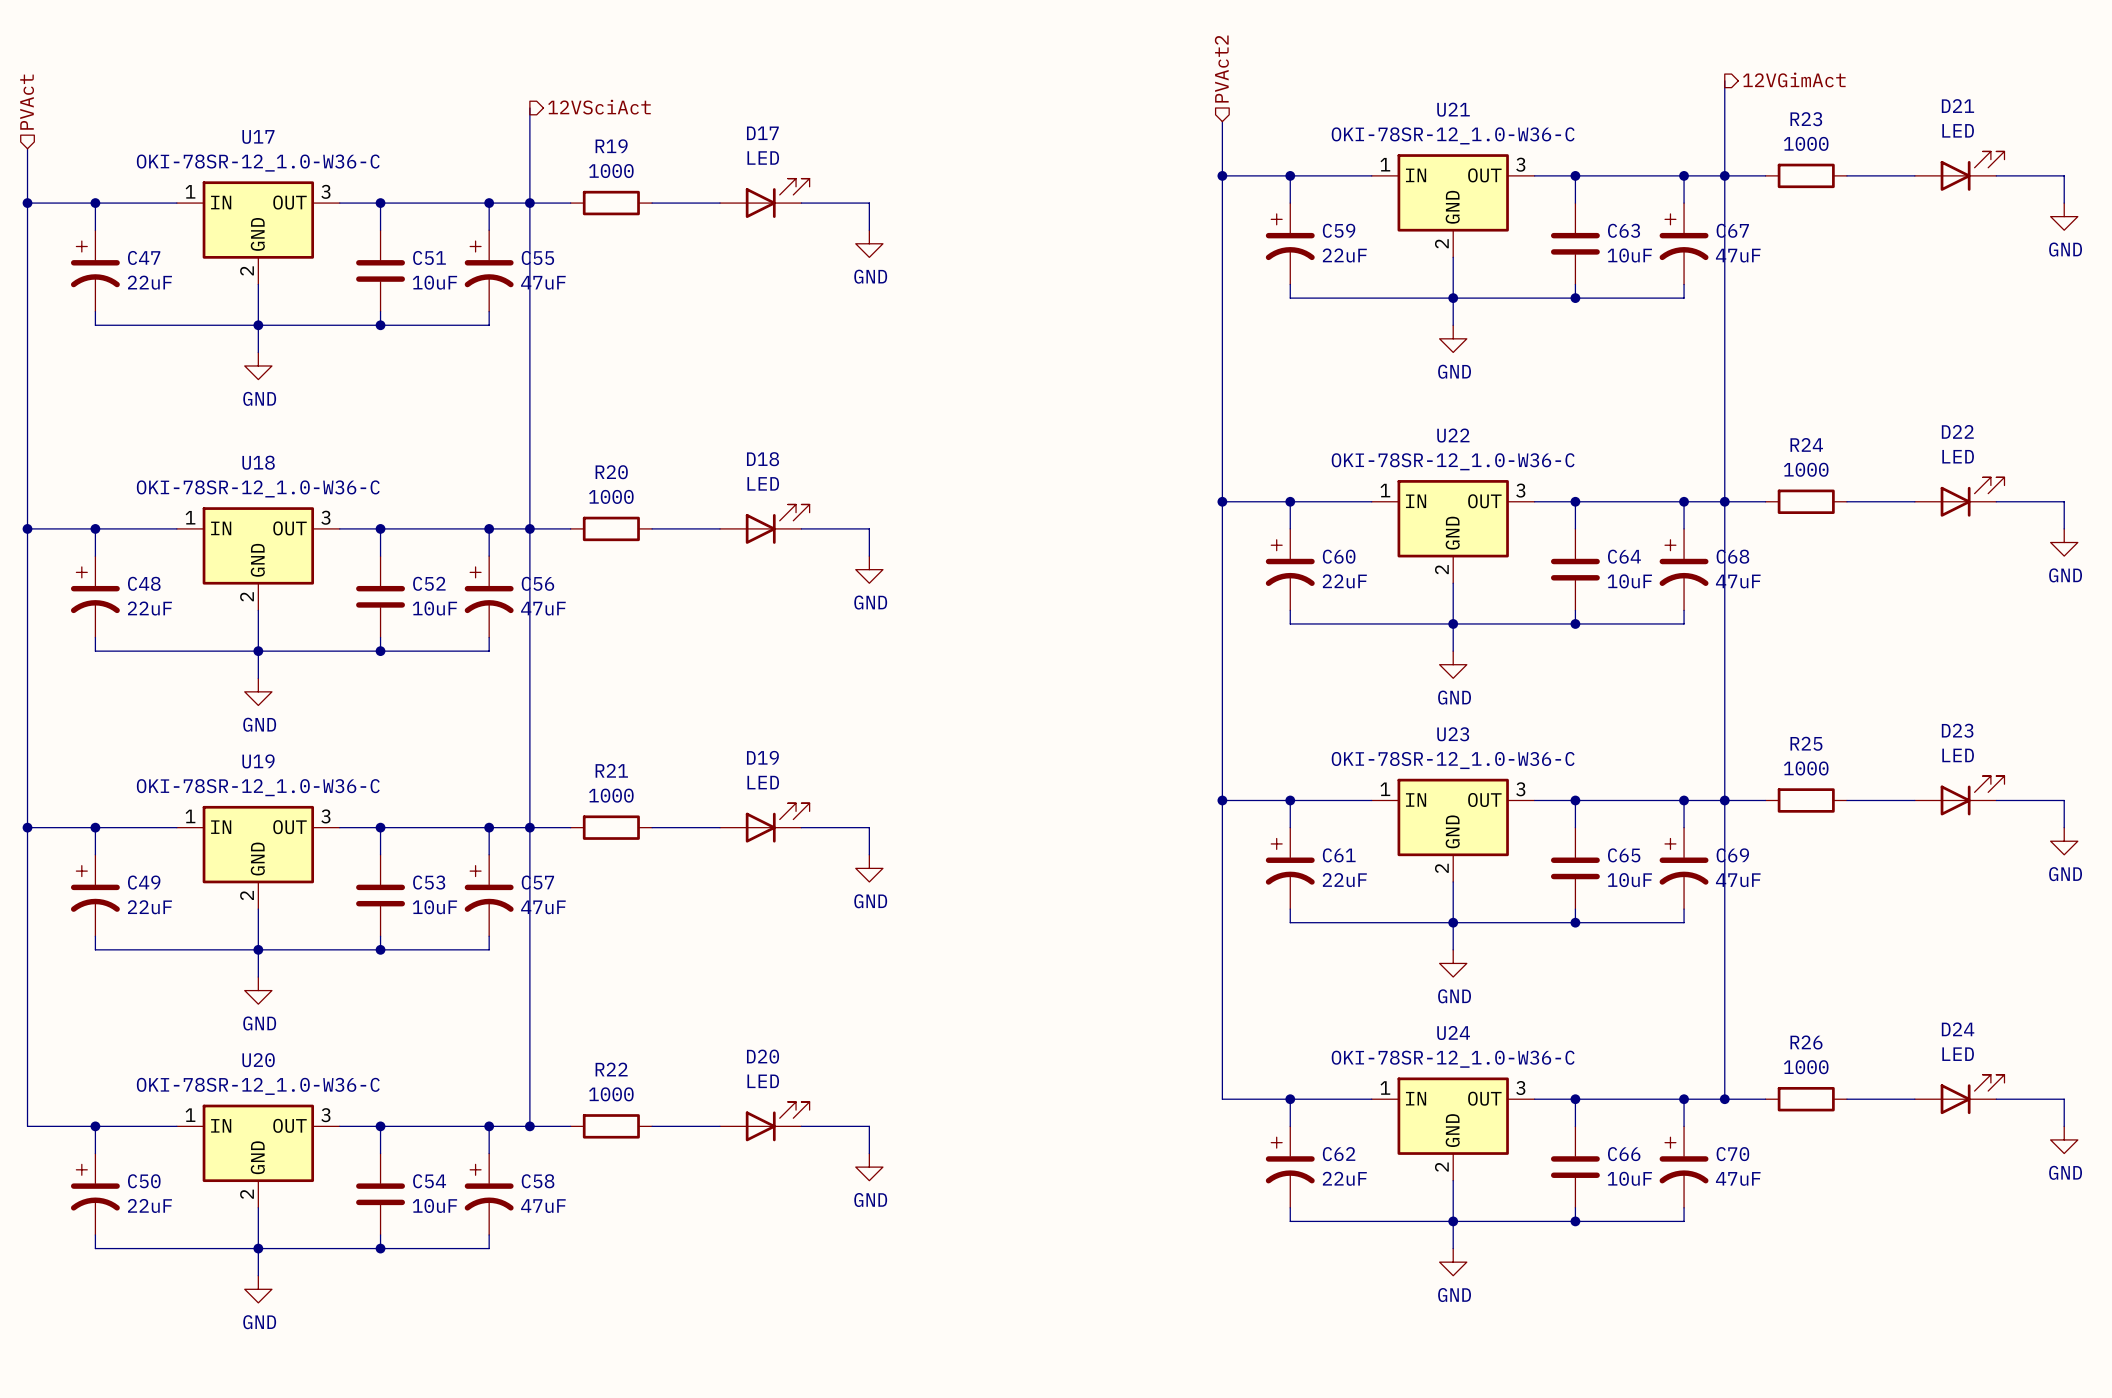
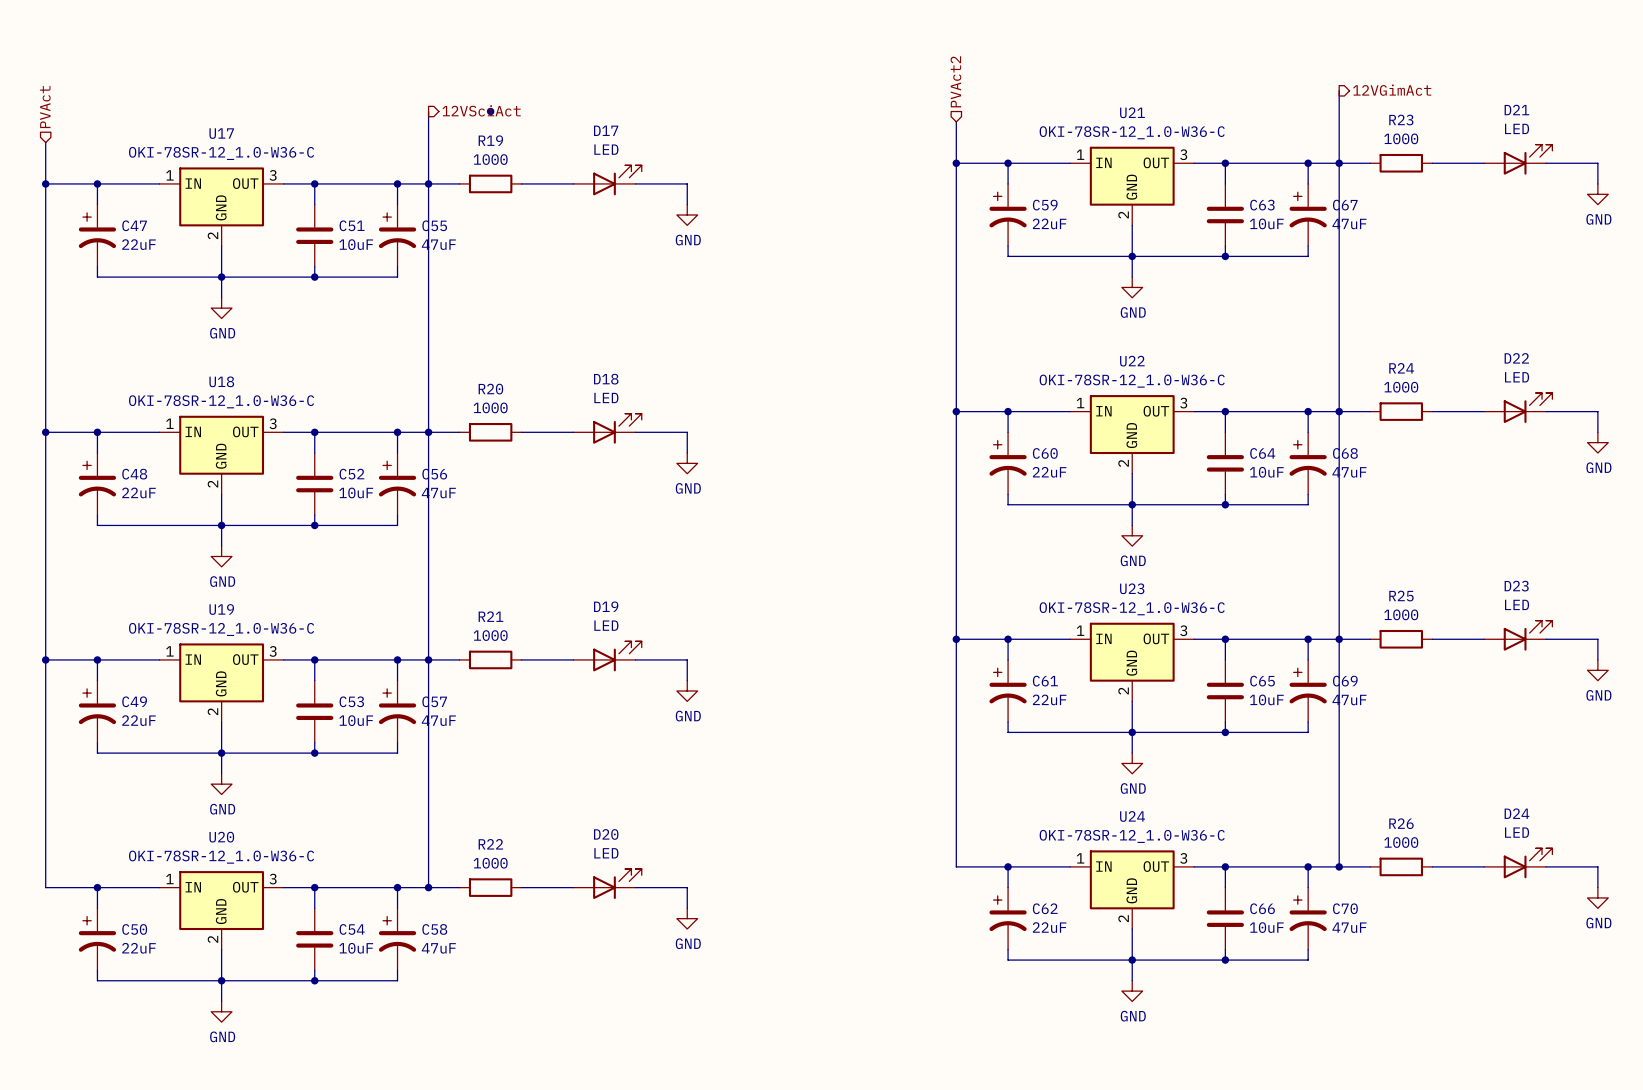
junction: none -> (490, 111)

